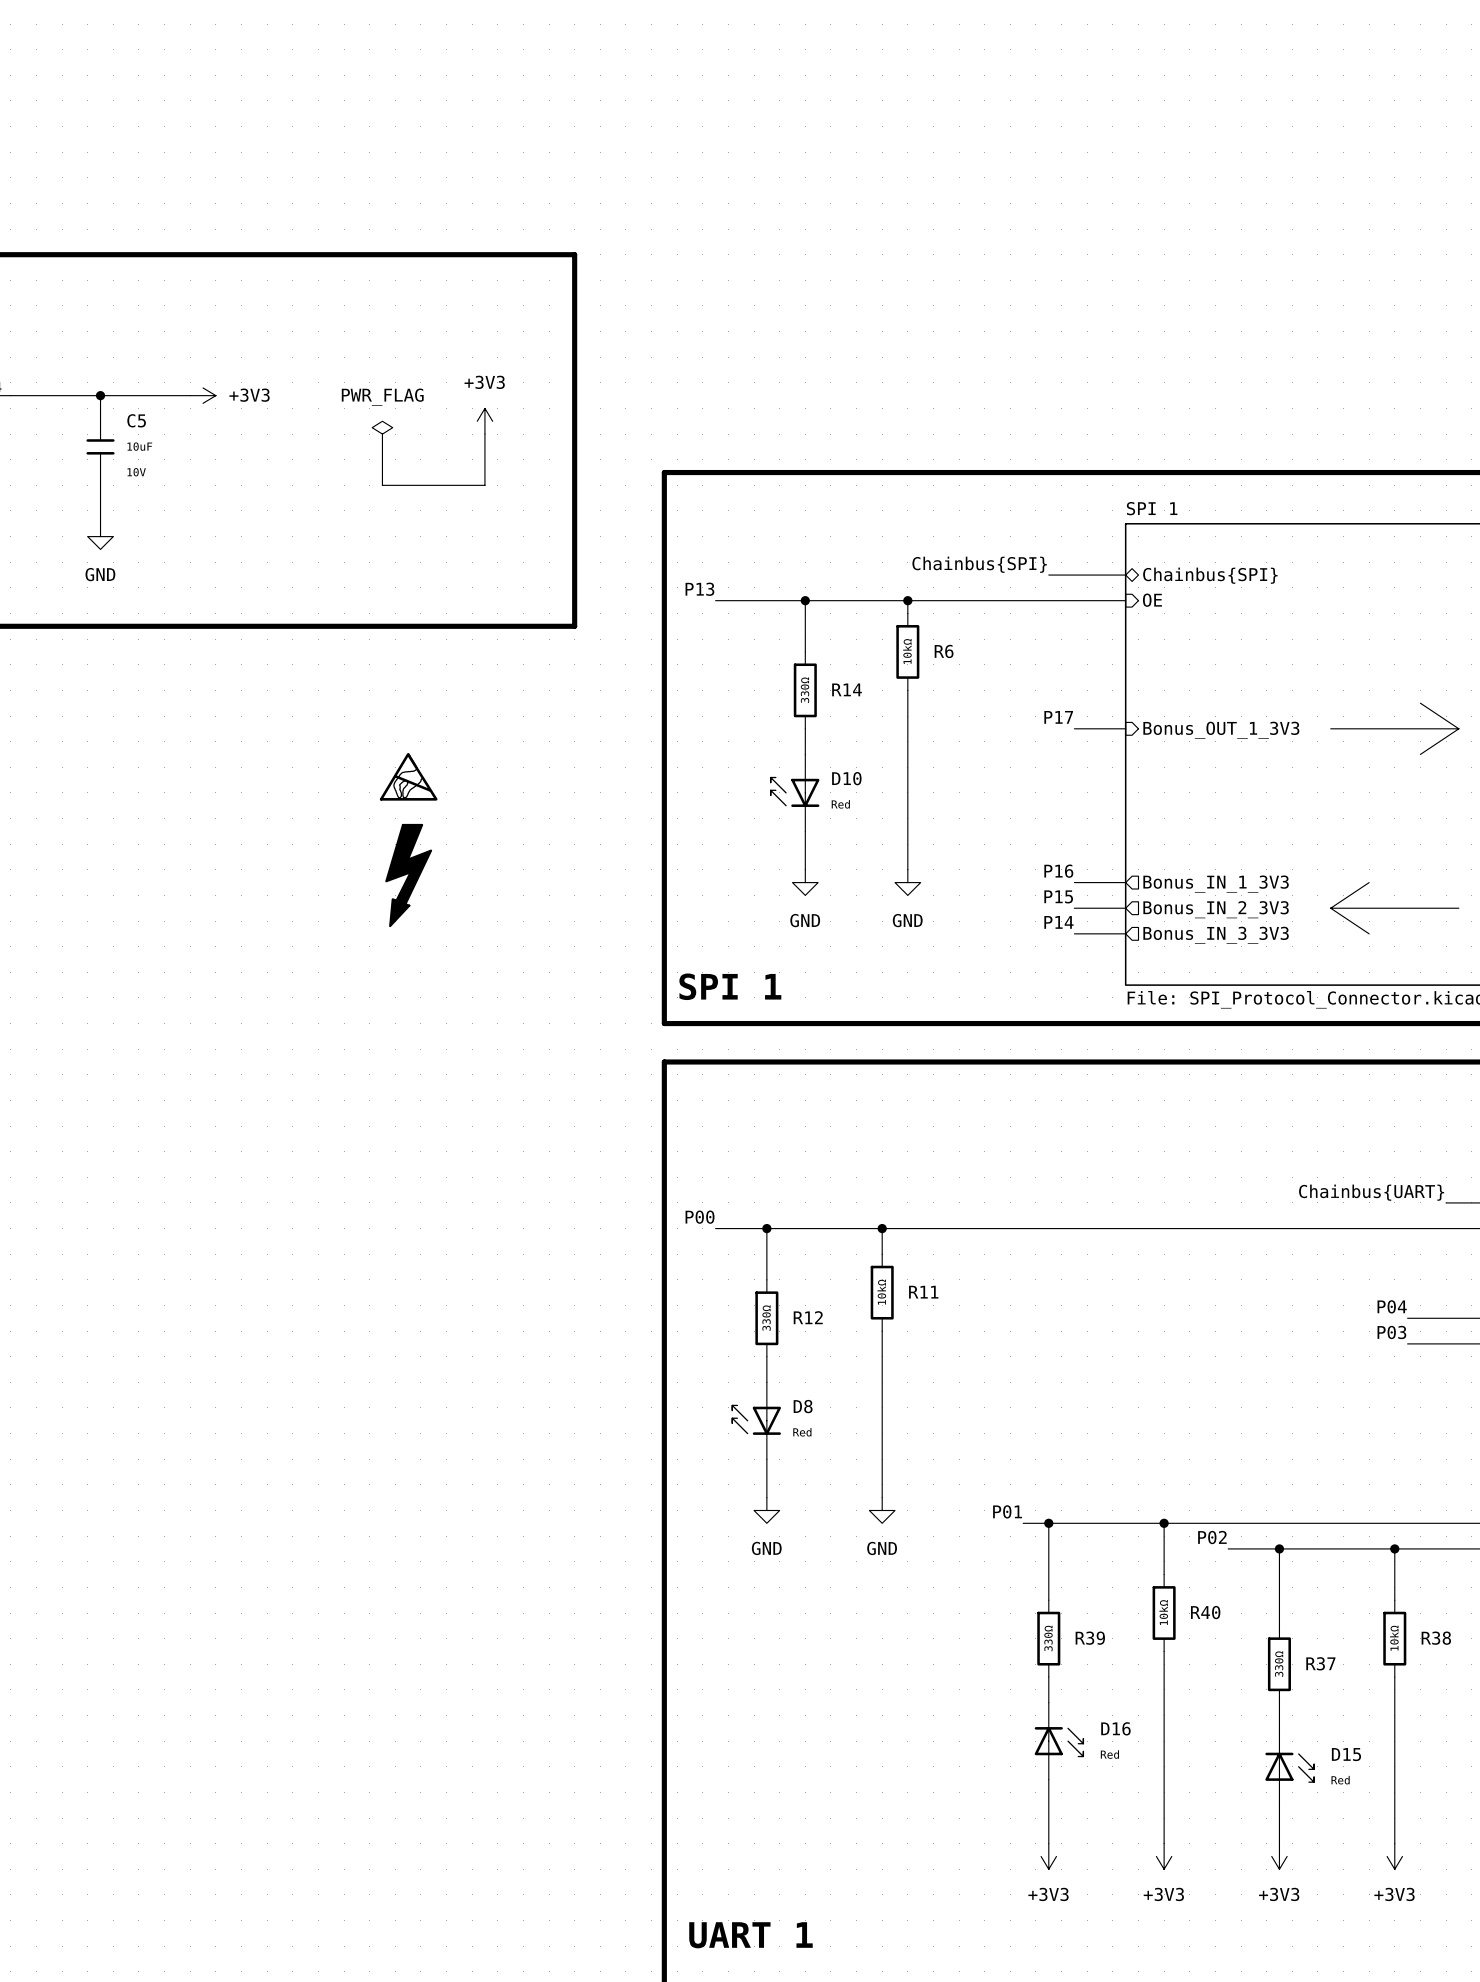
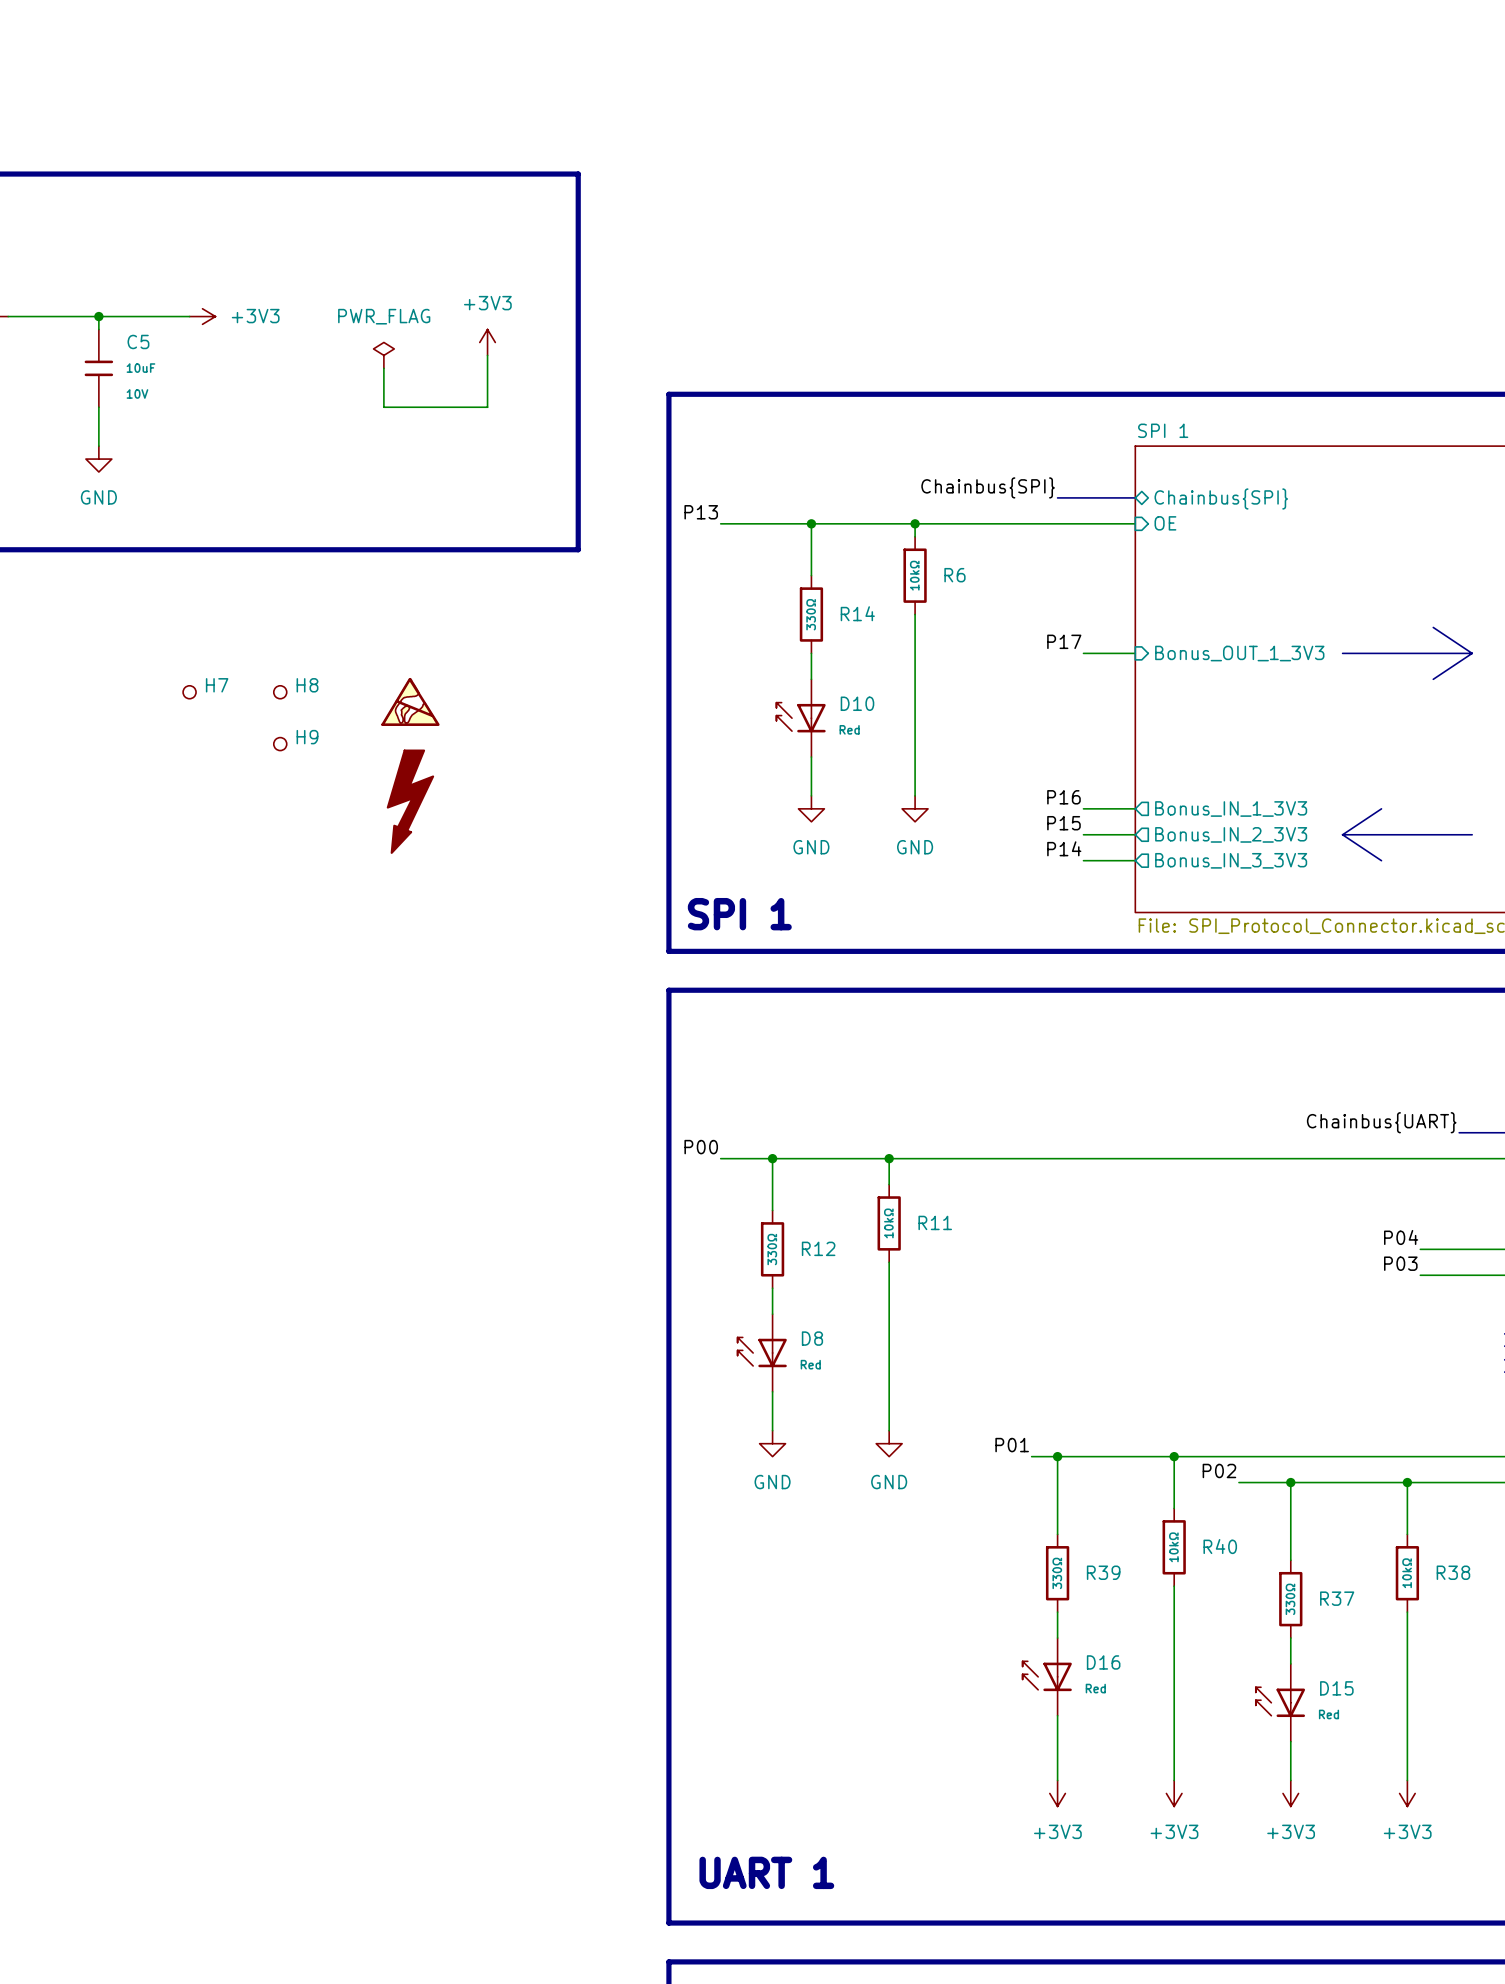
H7: none -> (189, 692)
H8: none -> (280, 692)
H9: none -> (280, 744)
D16 rotation: 0° (1059, 1742) -> 180° (1046, 1675)
D15 rotation: 0° (1290, 1767) -> 180° (1280, 1701)

